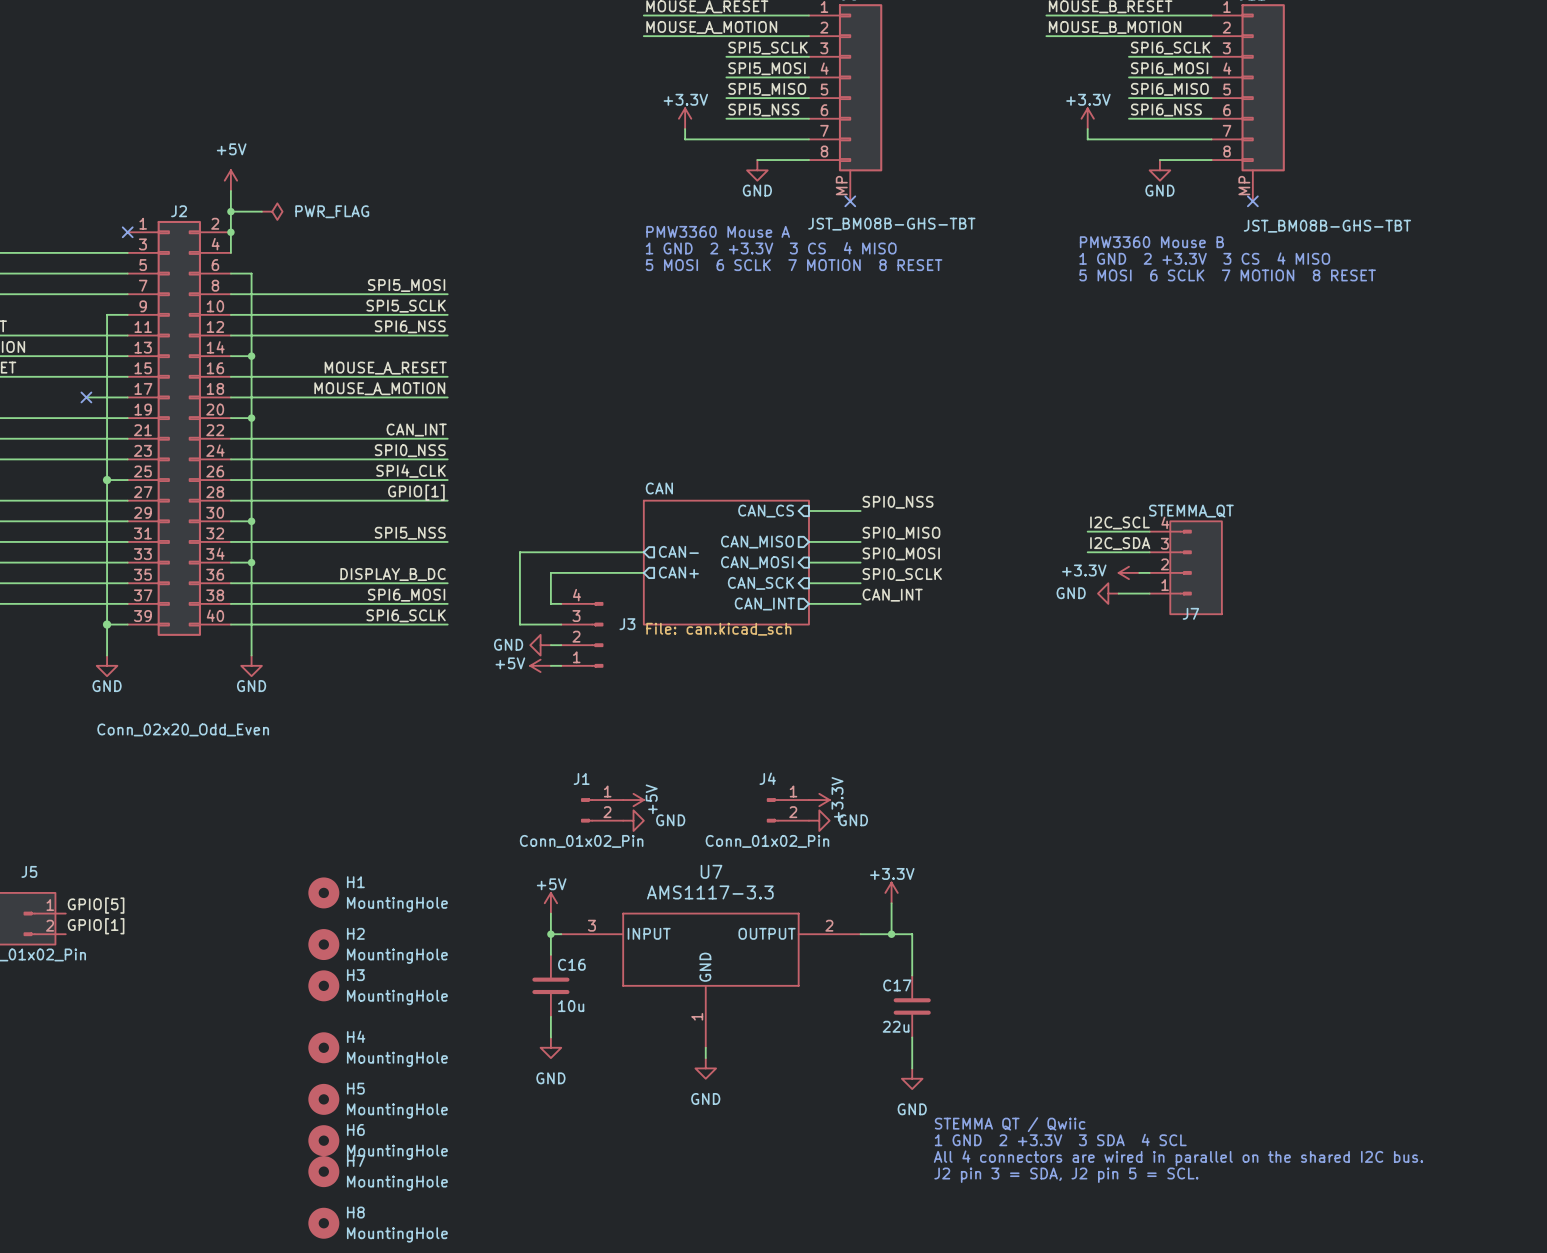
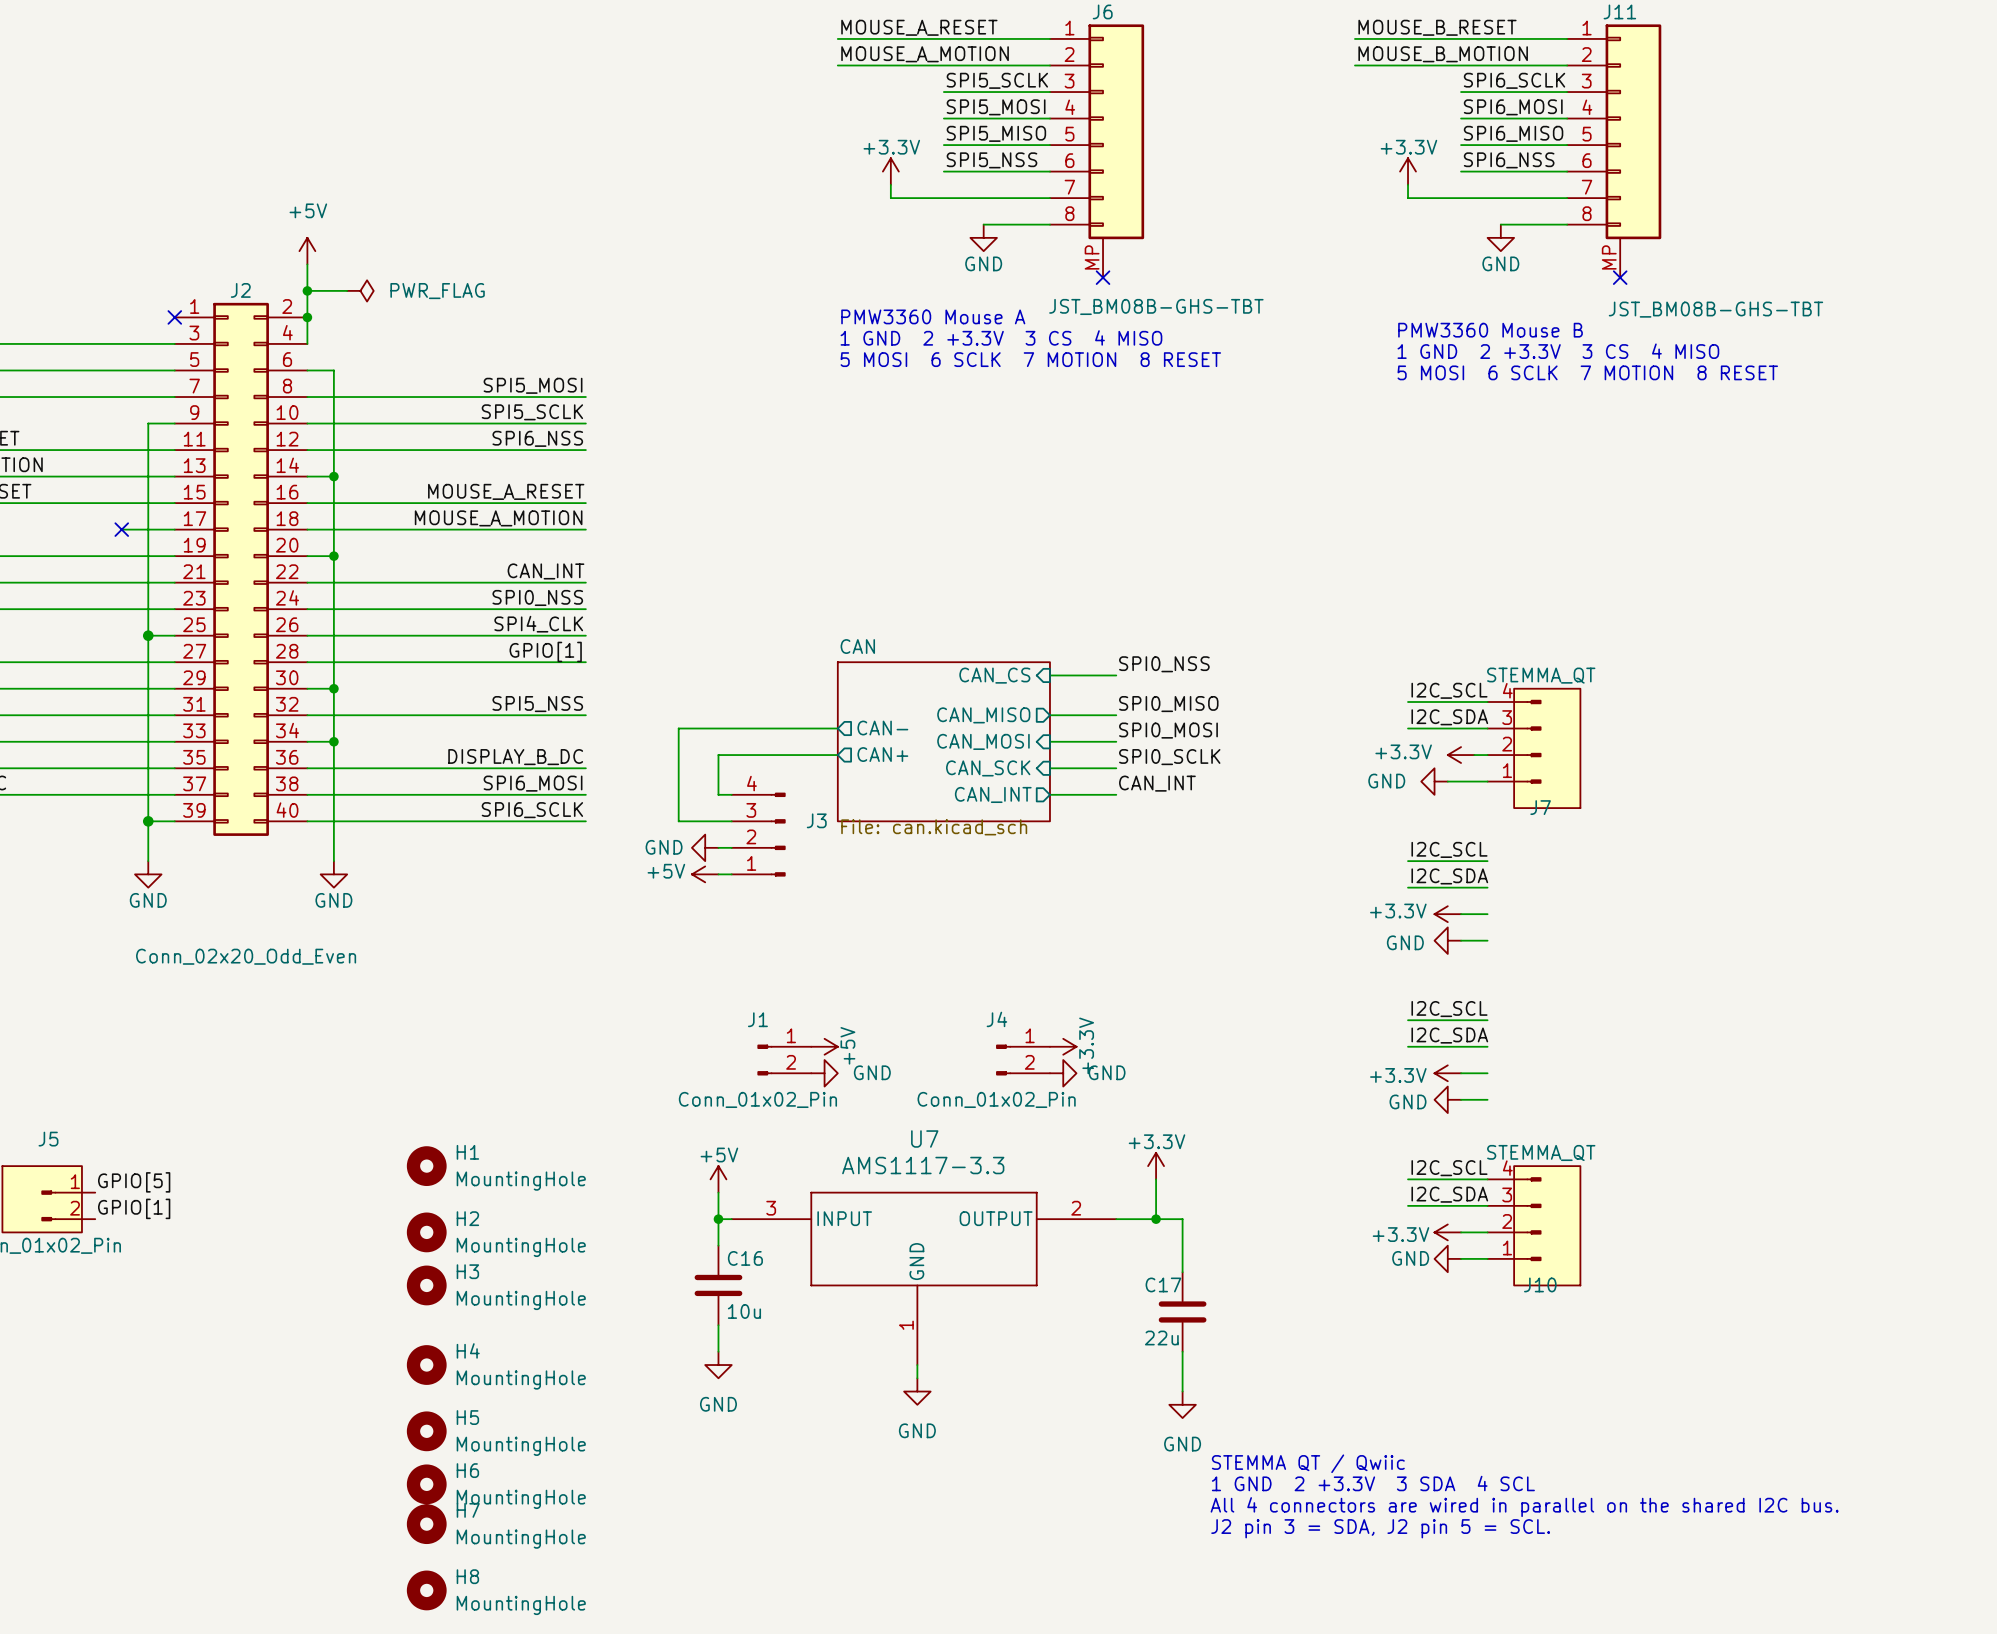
label: none -> I2C_SCL (1449, 849)
wire: none -> (1408, 861) (1487, 861)
label: none -> I2C_SDA (1449, 876)
wire: none -> (1408, 887) (1487, 887)
power symbol: none -> +3.3V (1447, 914)
wire: none -> (1461, 914) (1487, 914)
power symbol: none -> GND (1447, 940)
wire: none -> (1461, 940) (1487, 940)
label: none -> I2C_SCL (1449, 1009)
wire: none -> (1408, 1020) (1487, 1020)
label: none -> I2C_SDA (1449, 1035)
wire: none -> (1408, 1046) (1487, 1046)
power symbol: none -> +3.3V (1447, 1073)
wire: none -> (1461, 1073) (1487, 1073)
power symbol: none -> GND (1447, 1099)
wire: none -> (1461, 1099) (1487, 1099)
label: none -> I2C_SCL (1449, 1168)
wire: none -> (1408, 1179) (1487, 1179)
label: none -> I2C_SDA (1449, 1194)
wire: none -> (1408, 1205) (1487, 1205)
J10: none -> STEMMA_QT (1533, 1225)
power symbol: none -> +3.3V (1447, 1232)
wire: none -> (1461, 1232) (1487, 1232)
power symbol: none -> GND (1447, 1258)
wire: none -> (1461, 1258) (1487, 1258)

